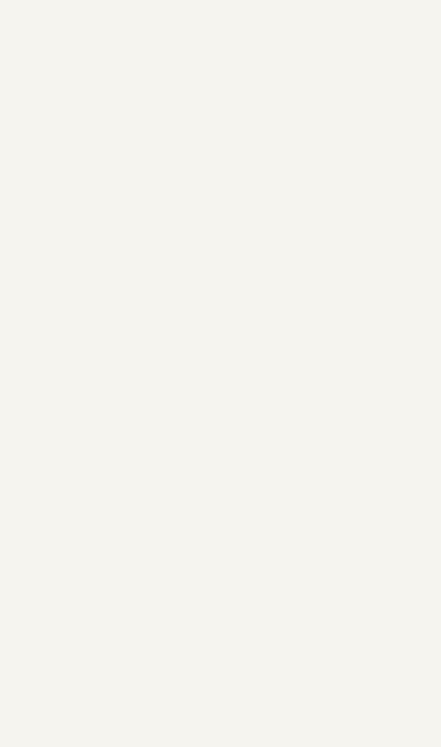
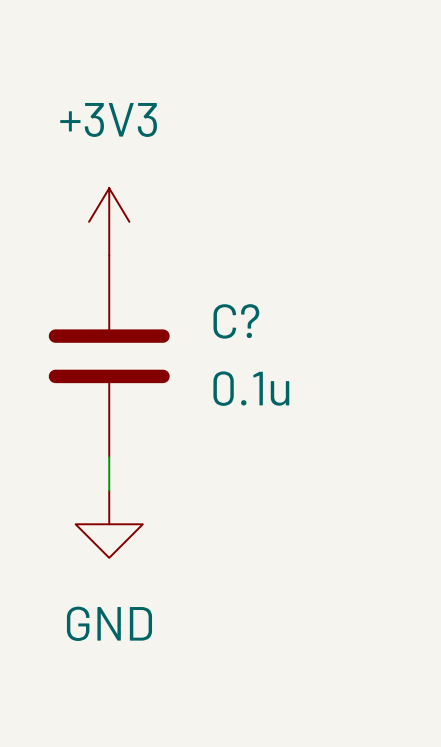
power symbol: none -> +3V3 (109, 221)
C?: none -> 0.1u (109, 356)
wire: none -> (109, 457) (109, 490)
power symbol: none -> GND (109, 524)

